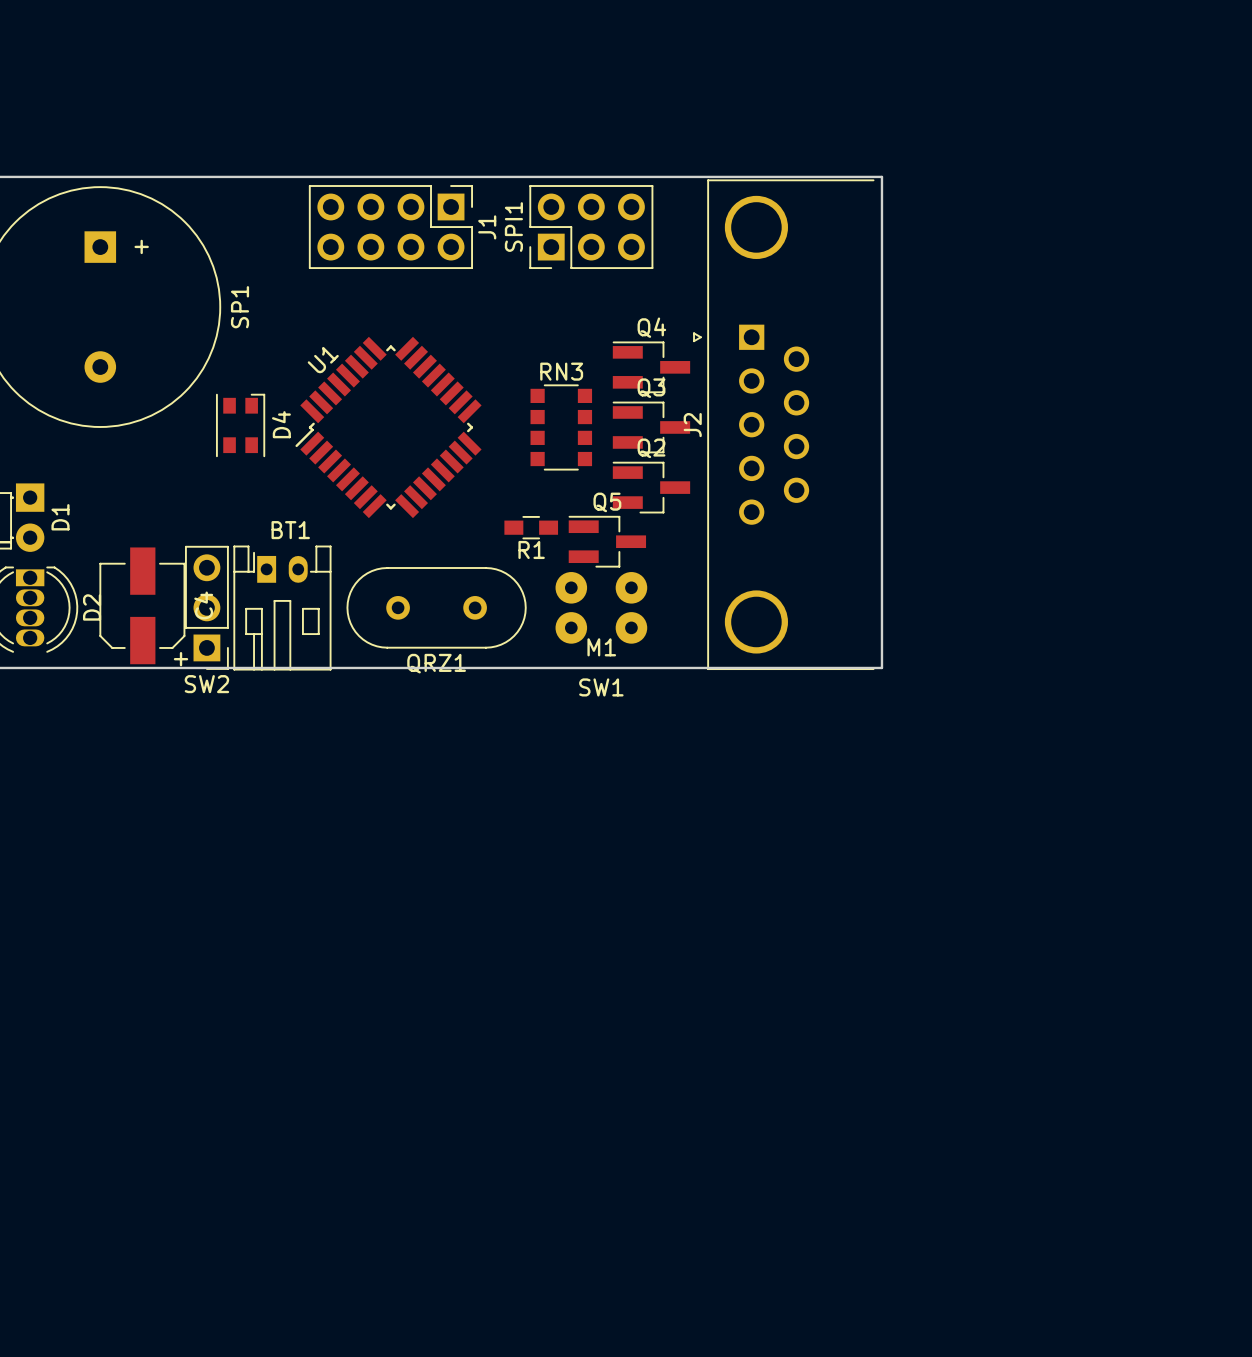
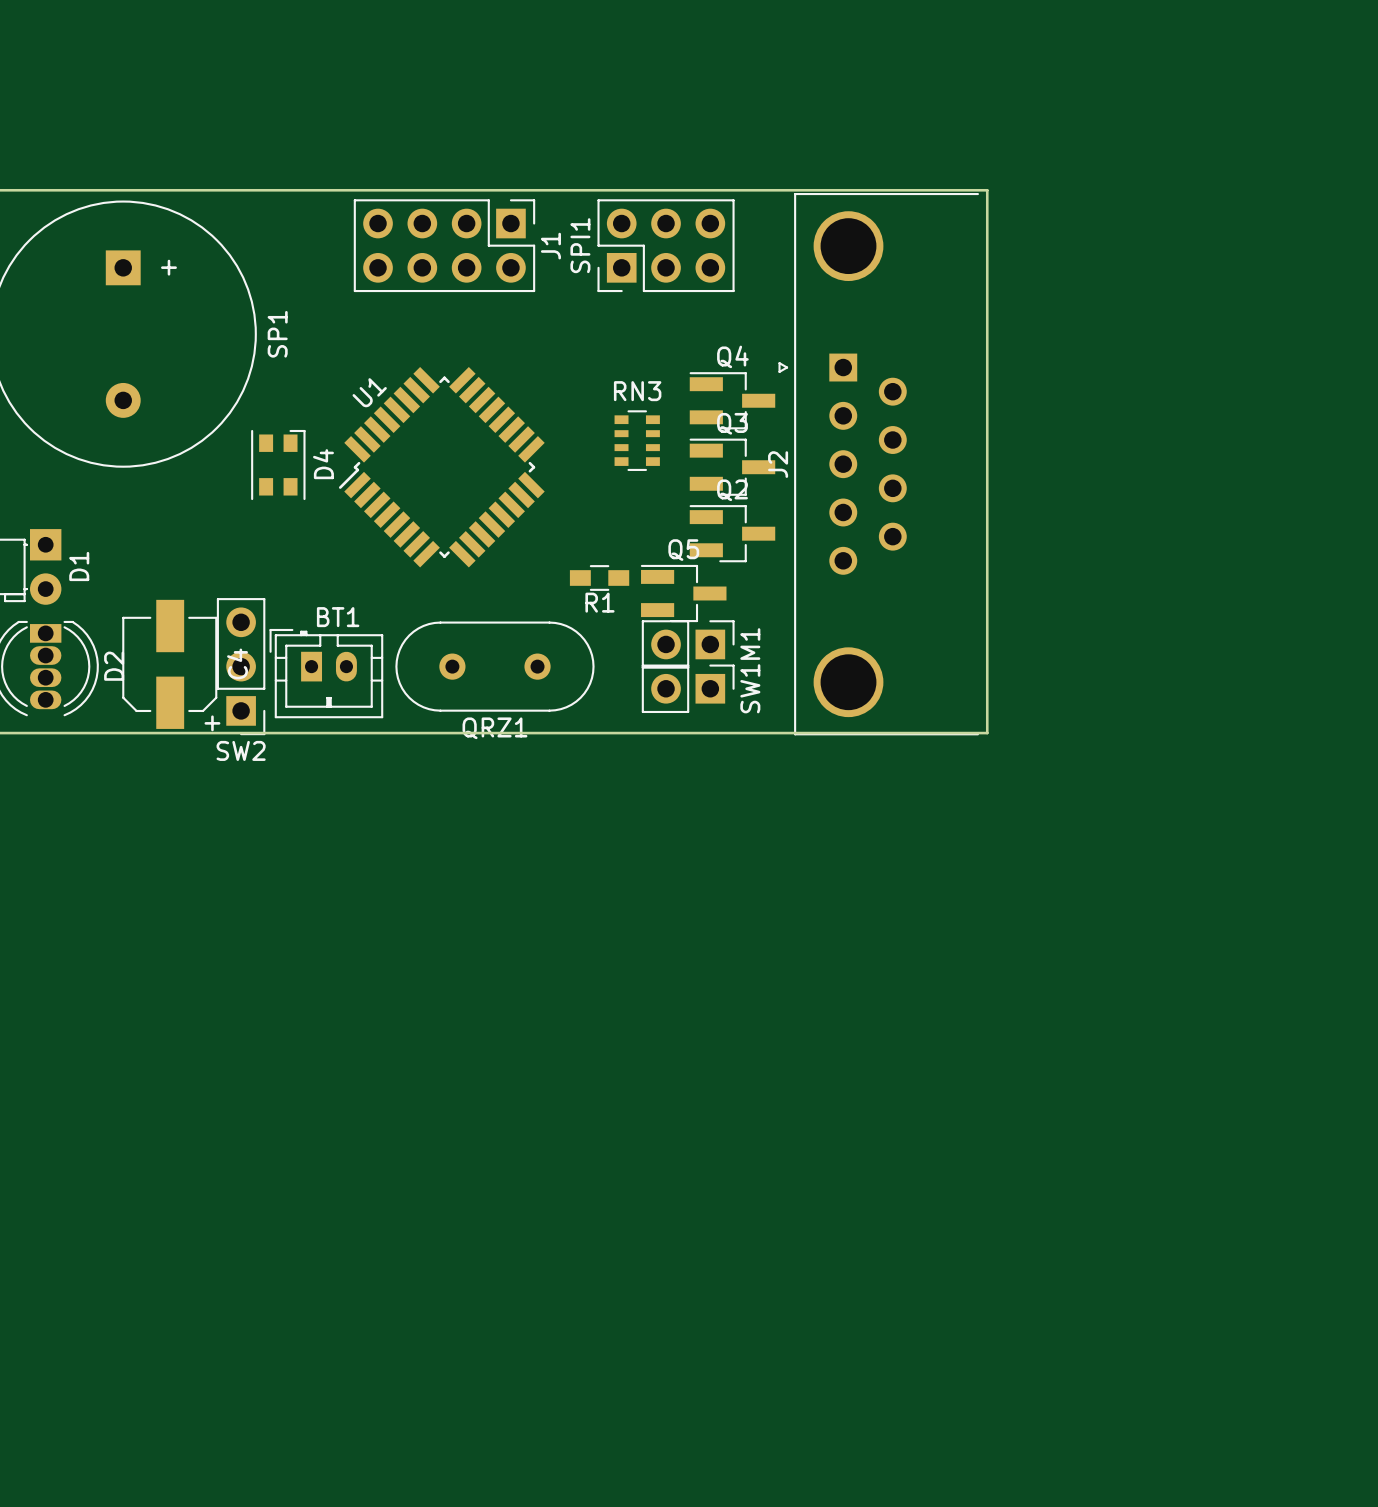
RN3 footprint: [530, 384, 593, 471] -> [614, 410, 660, 471]
BT1 footprint: [233, 545, 332, 671] -> [269, 628, 384, 719]
M1 footprint: [555, 572, 648, 604] -> [641, 620, 735, 669]
SW1 footprint: [555, 612, 648, 644] -> [641, 664, 735, 714]
M1 name position: M1 (601, 647) -> M1 (750, 644)
SW1 name position: SW1 (601, 687) -> SW1 (750, 688)

